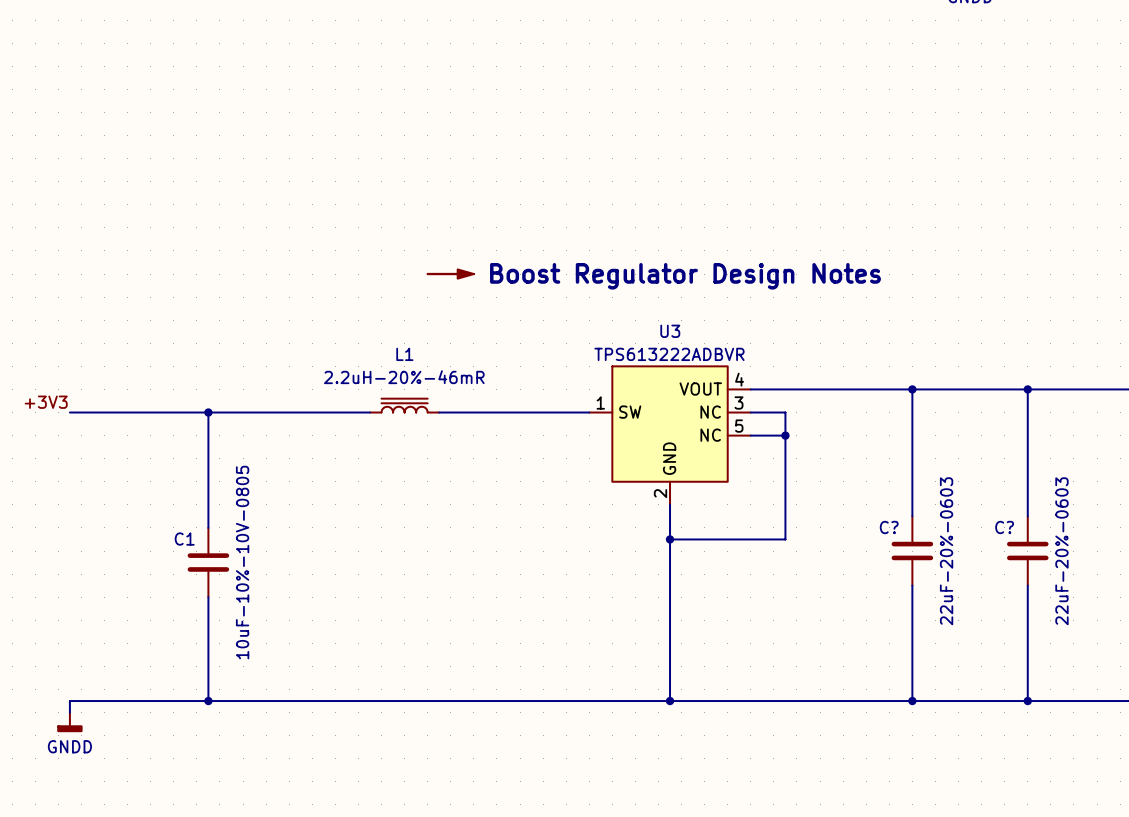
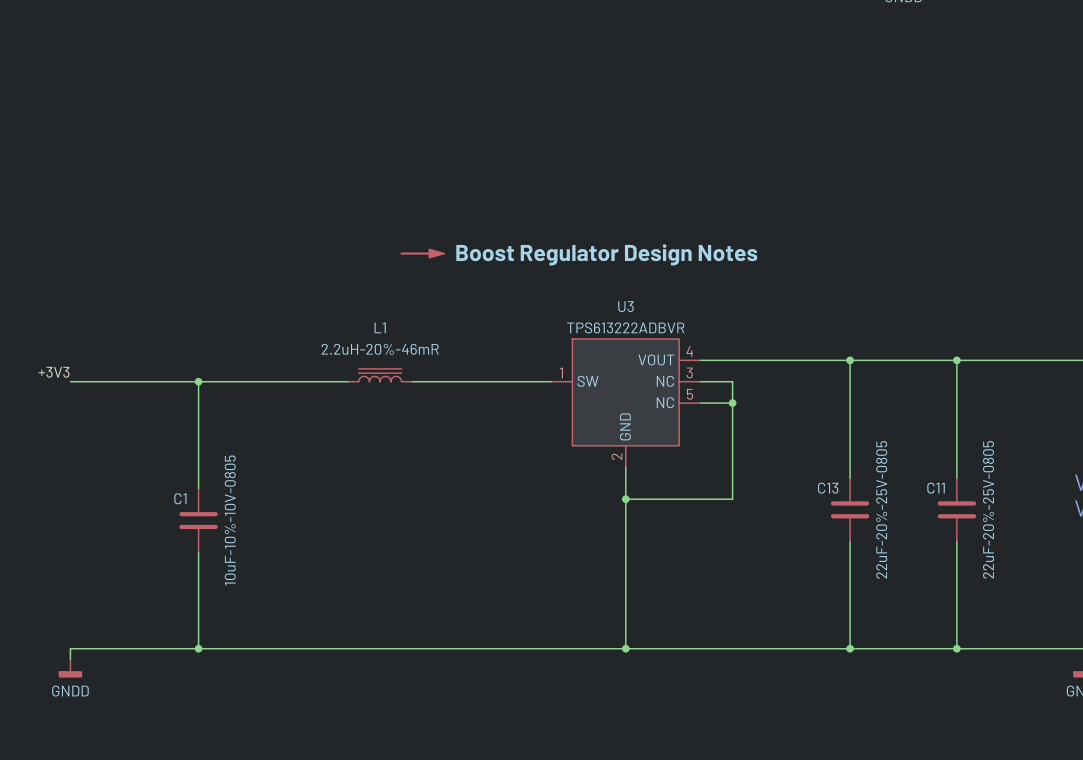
C? name: C? (889, 527) -> C13 (828, 488)
C? name: C? (1004, 527) -> C11 (936, 488)
C? value: 22uF-20%-0603 (946, 551) -> 22uF-20%-25V-0805 (881, 509)
C? value: 22uF-20%-0603 (1061, 551) -> 22uF-20%-25V-0805 (988, 509)

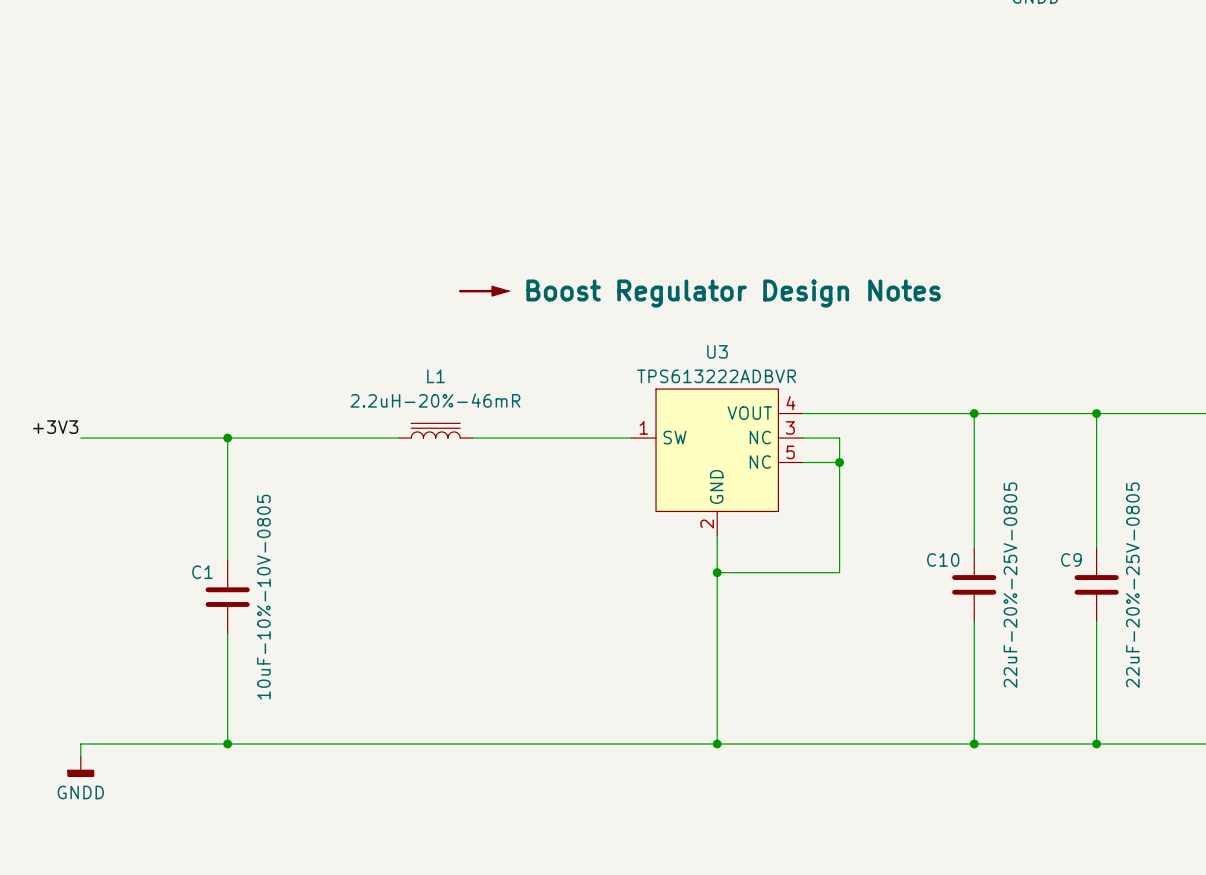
C13 name: C13 (828, 488) -> C10 (943, 559)
C11 name: C11 (936, 488) -> C9 (1071, 559)

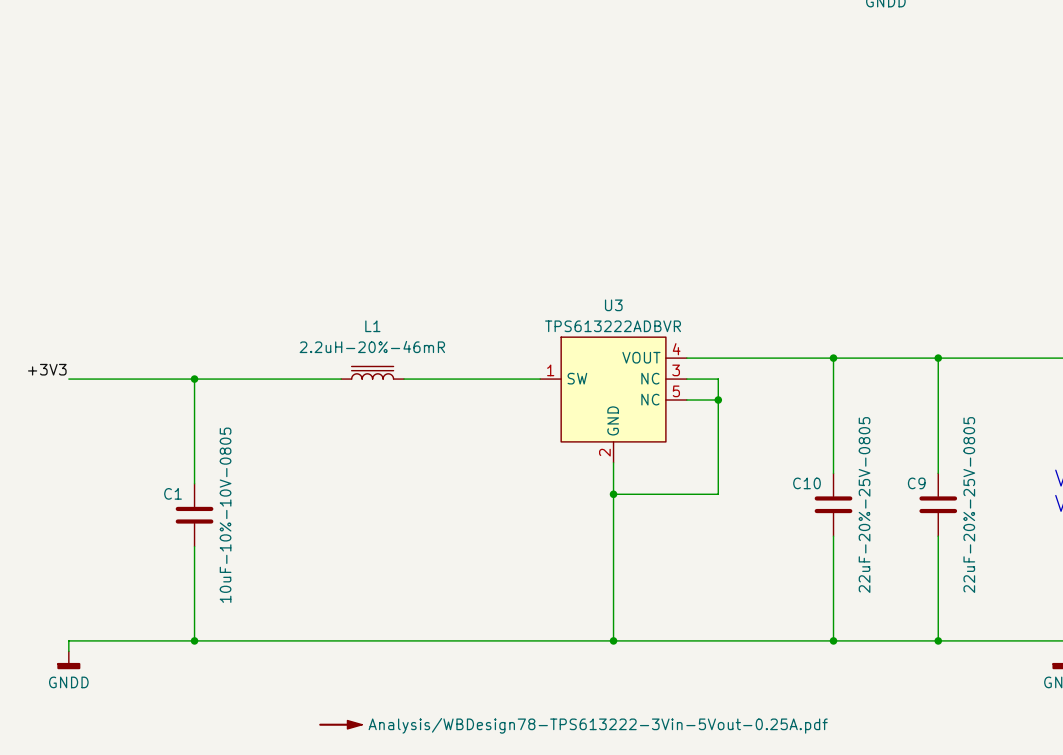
power symbol: Boost Regulator Design Notes (484, 291) -> none
power symbol: none -> (340, 724)

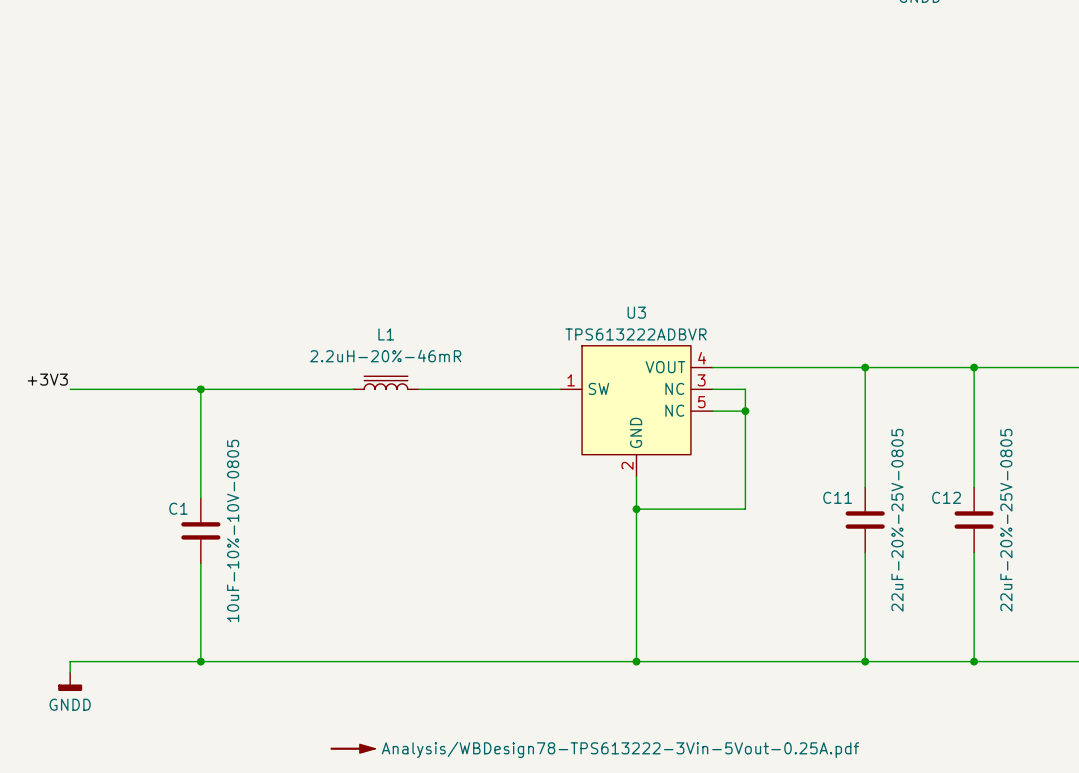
C10 name: C10 (806, 483) -> C11 (837, 497)
C9 name: C9 (916, 483) -> C12 (946, 497)

